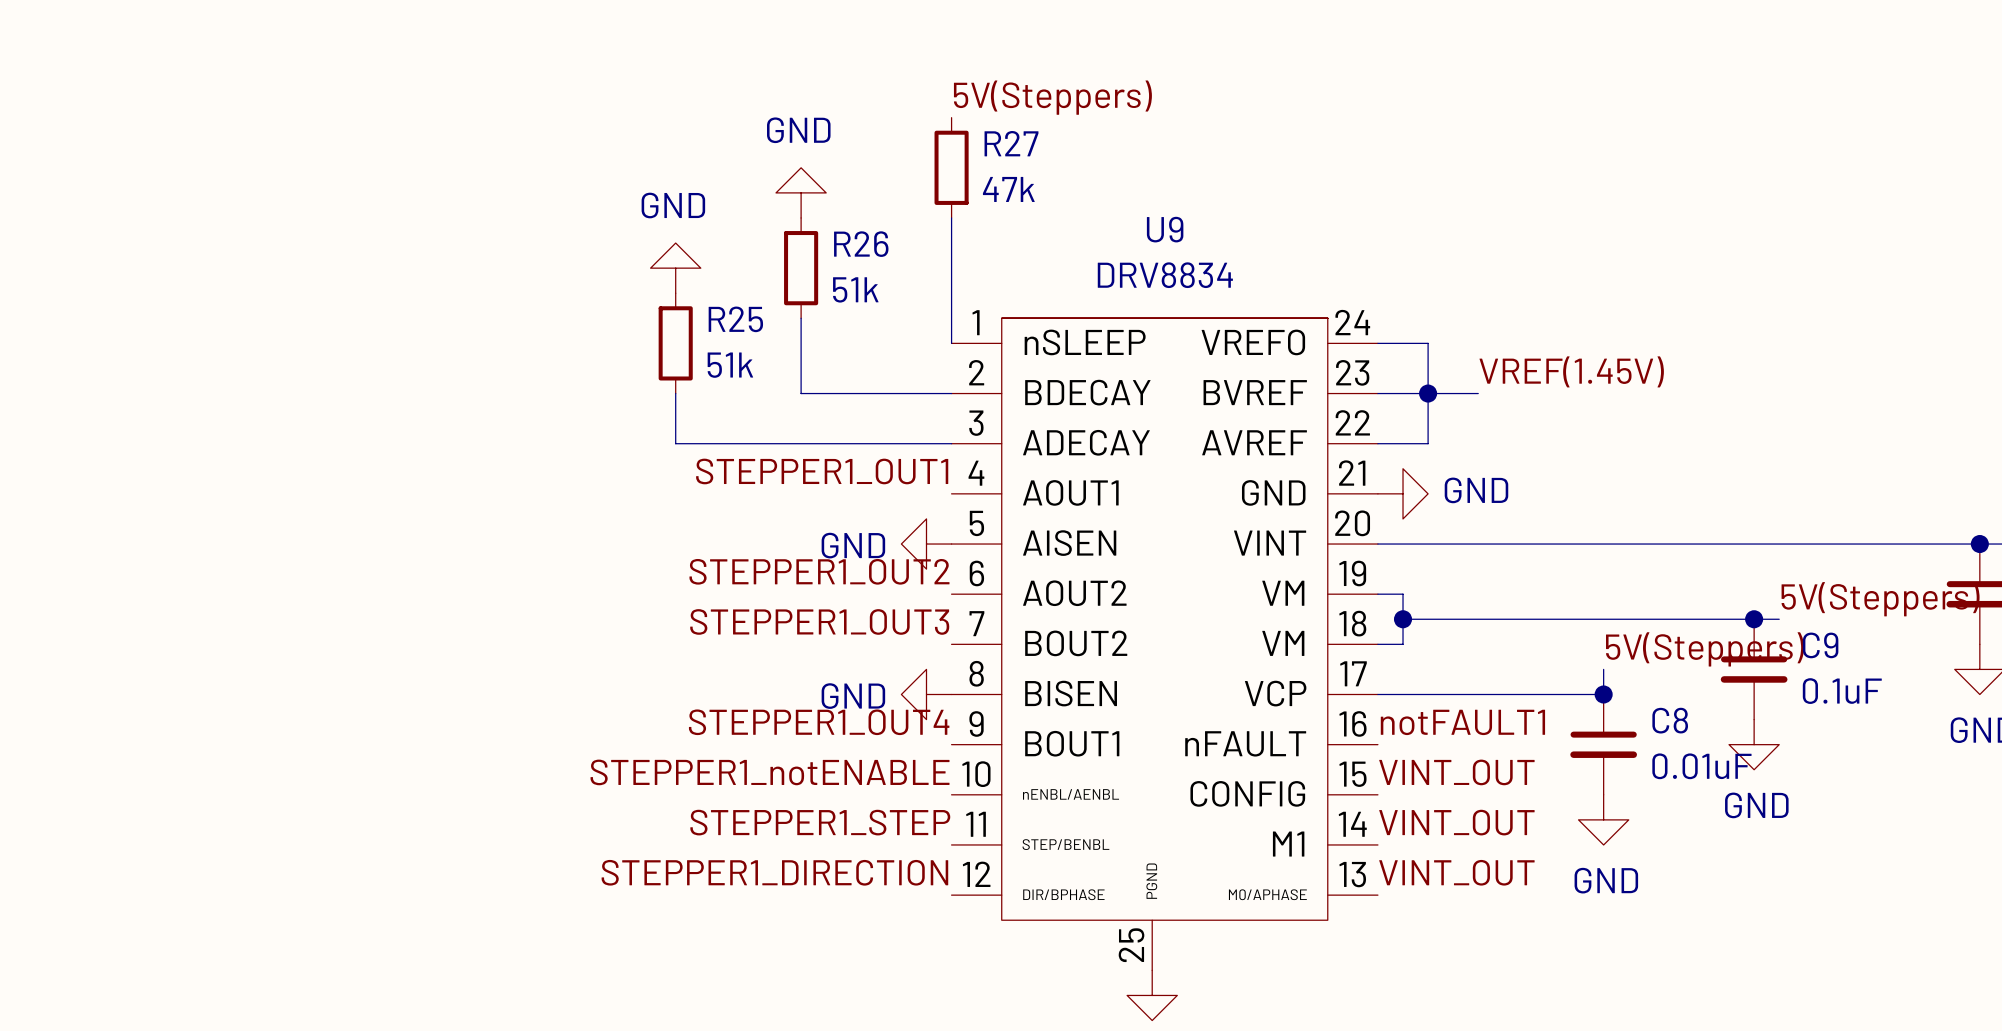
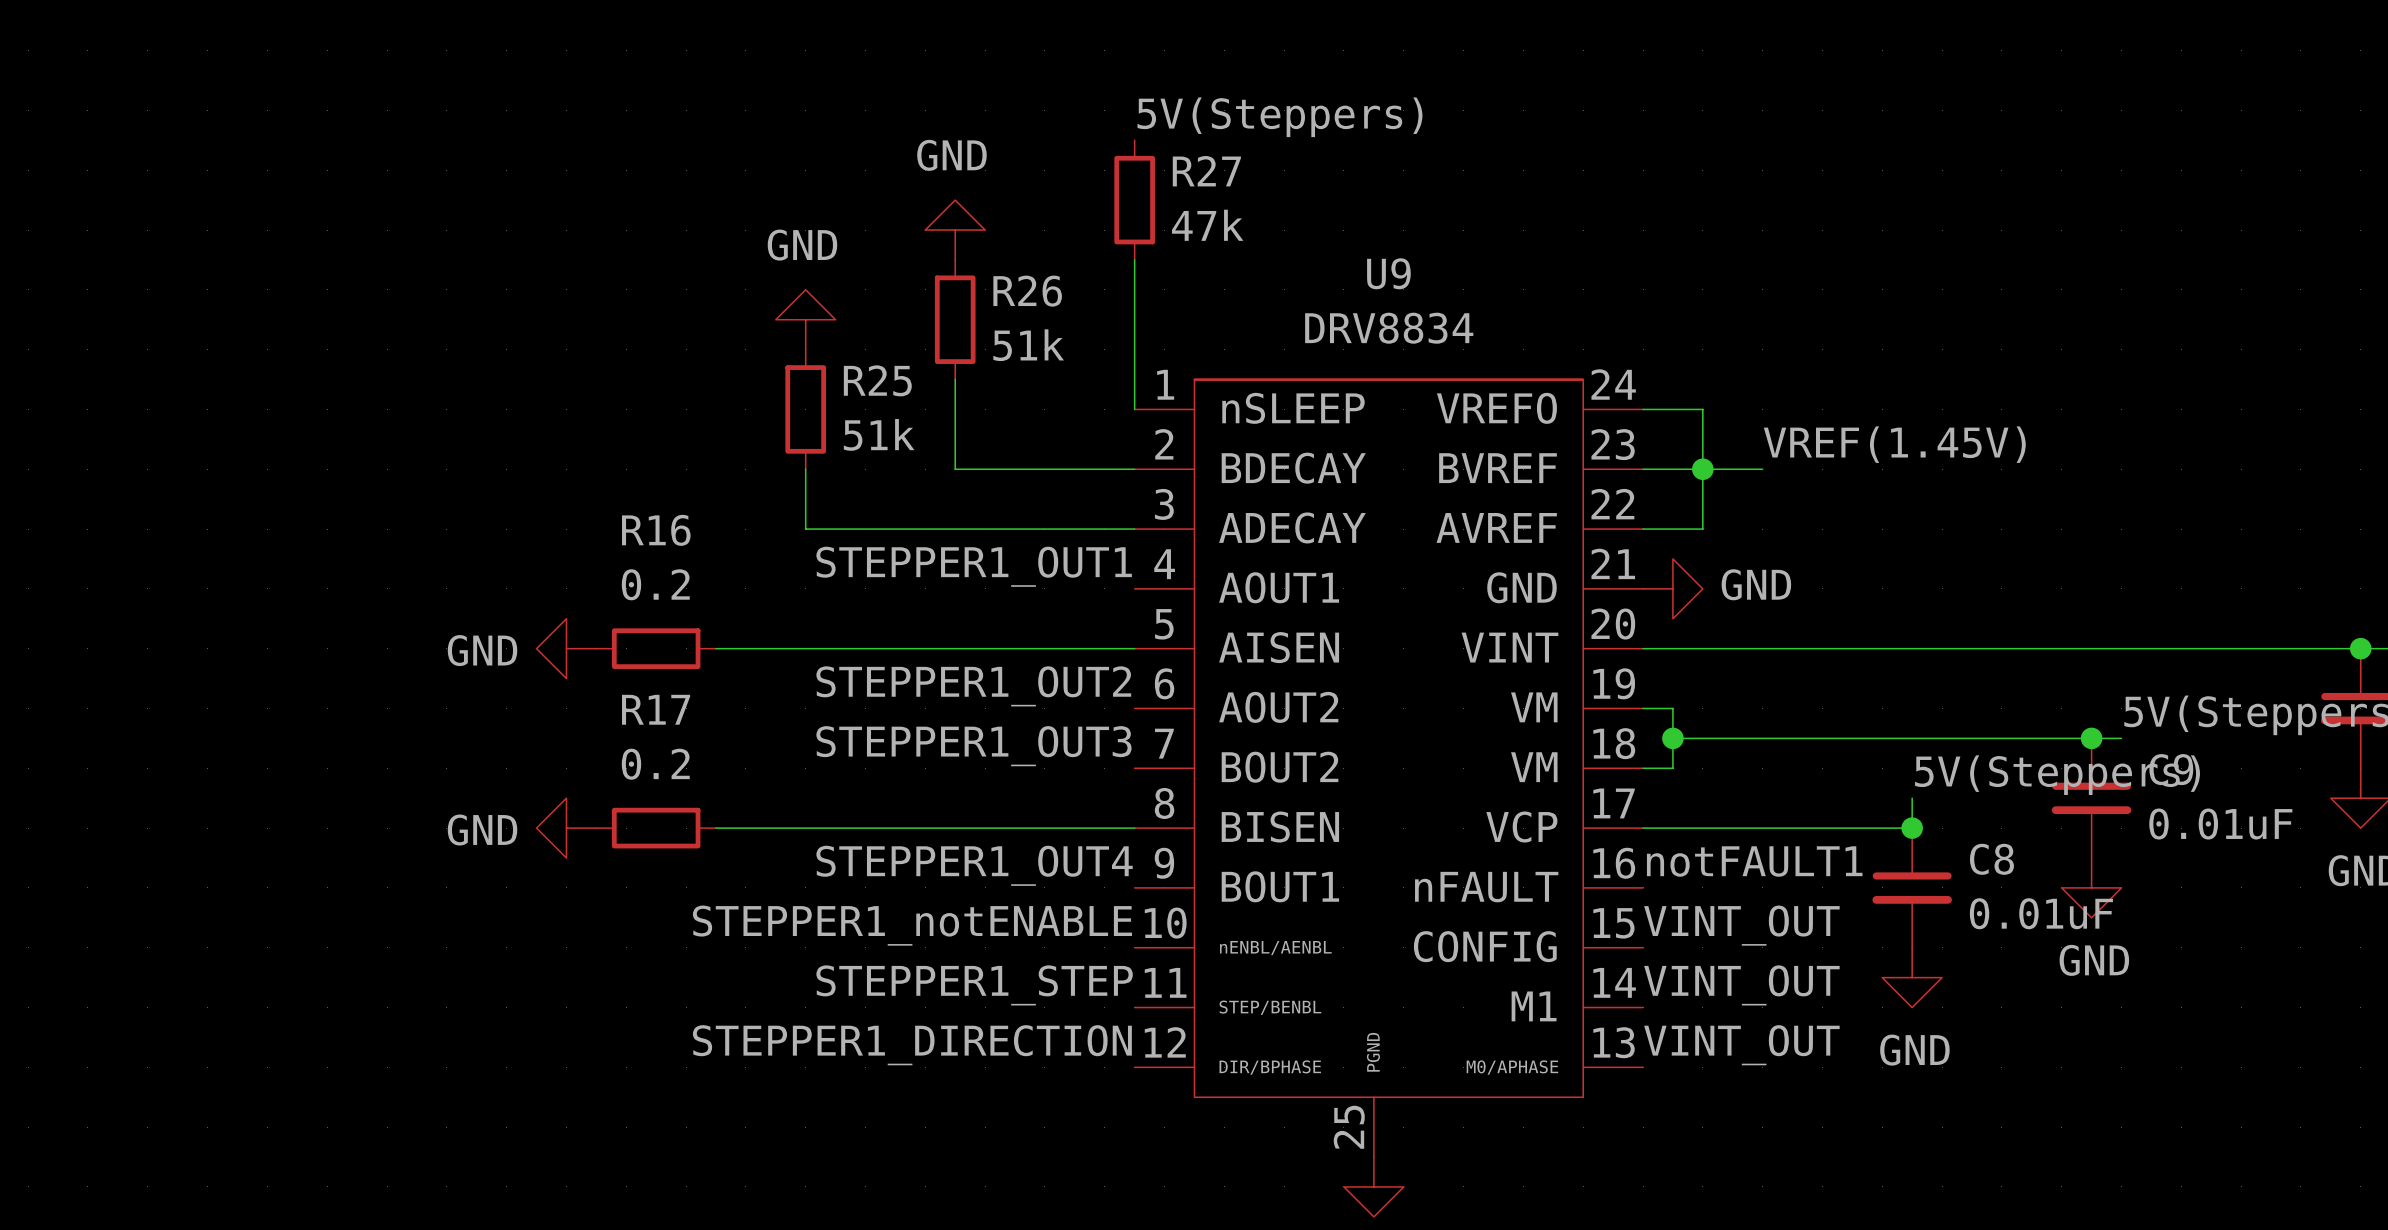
power symbol: none -> GND (566, 648)
R16: none -> 0.2 (656, 648)
wire: none -> (715, 648) (1134, 648)
power symbol: GND (926, 544) -> none
C9 value: 0.1uF (1842, 691) -> 0.01uF (2220, 824)
power symbol: none -> GND (566, 828)
R17: none -> 0.2 (656, 828)
wire: none -> (715, 828) (1134, 828)
power symbol: GND (926, 694) -> none

